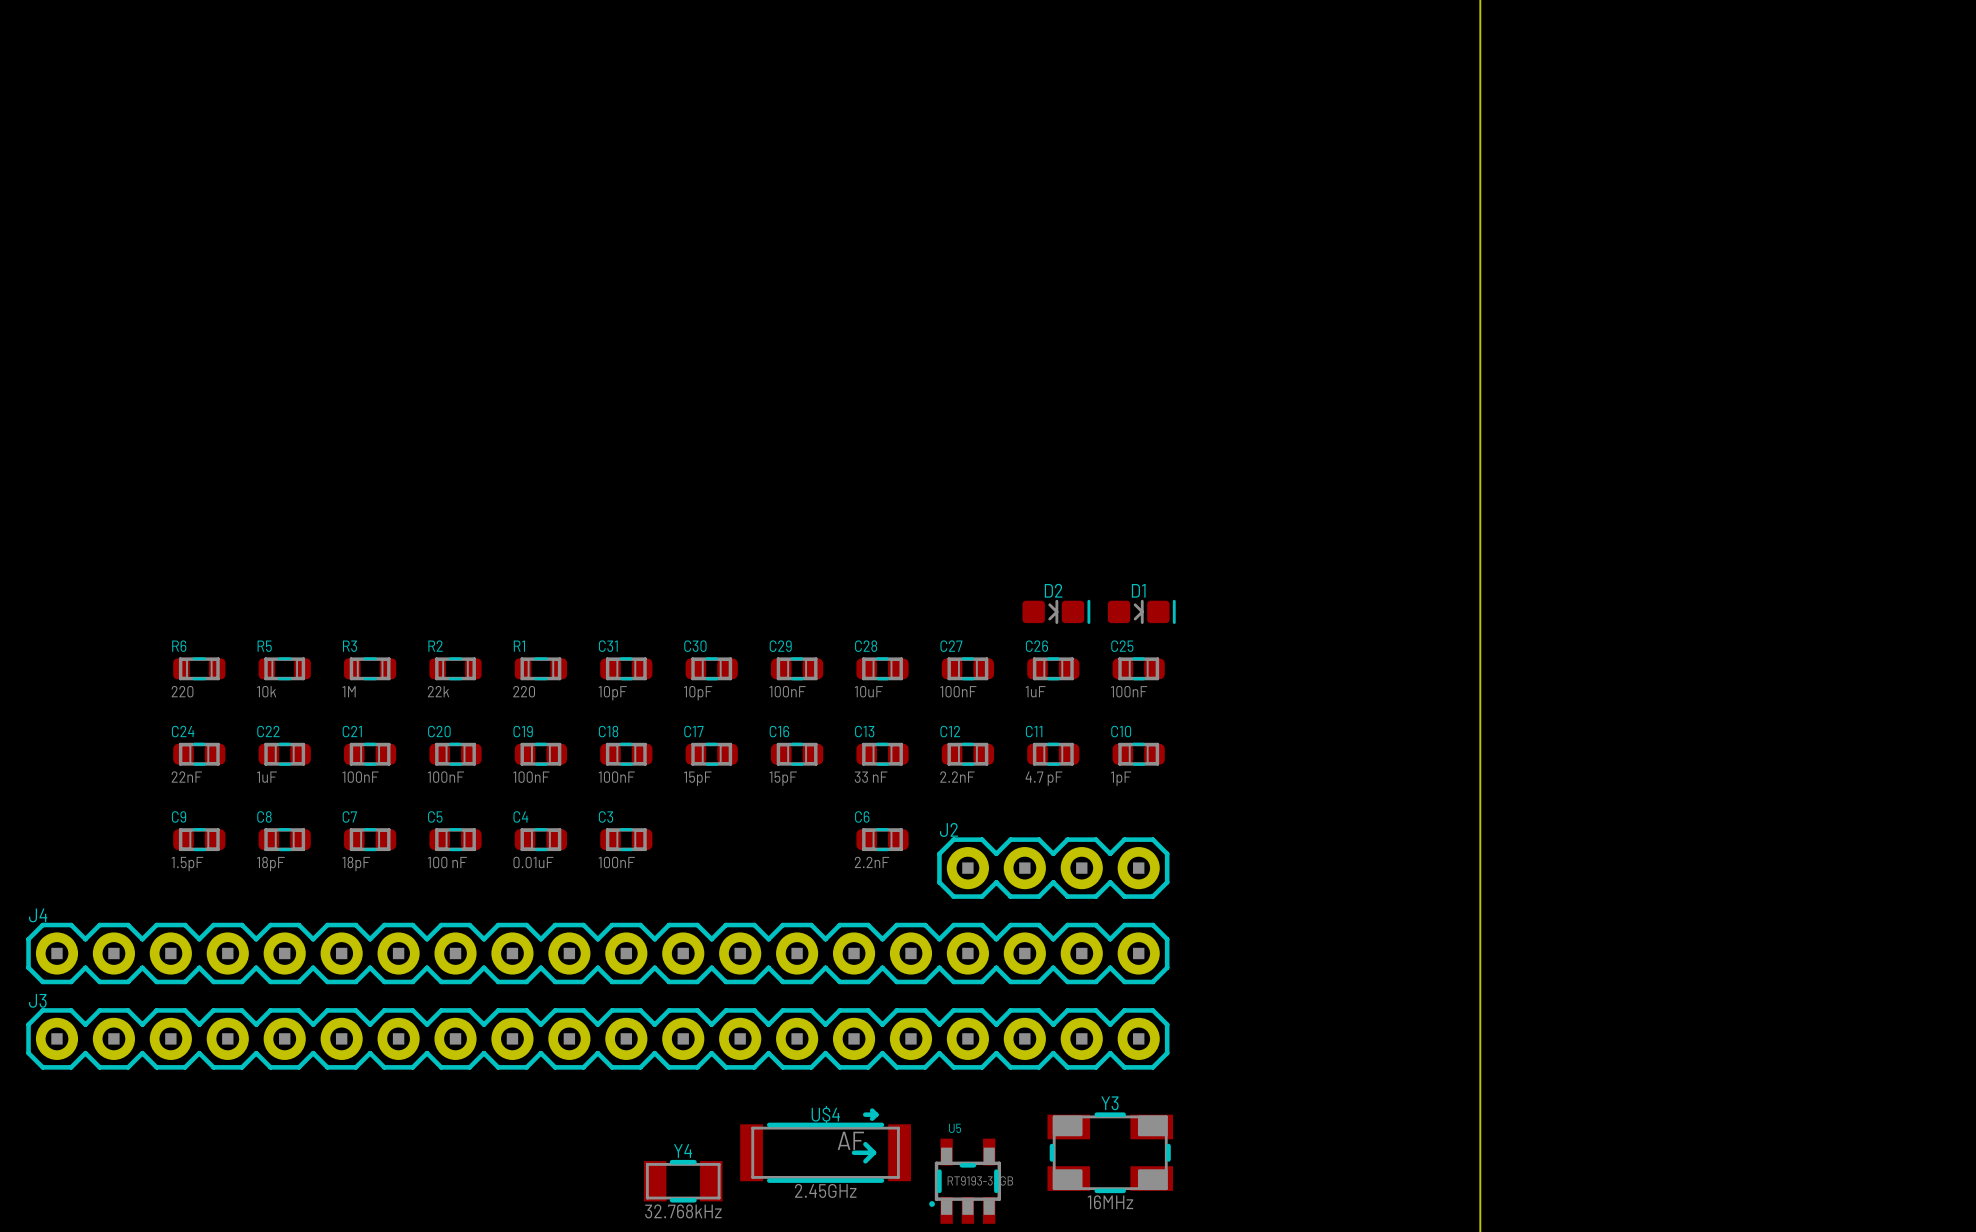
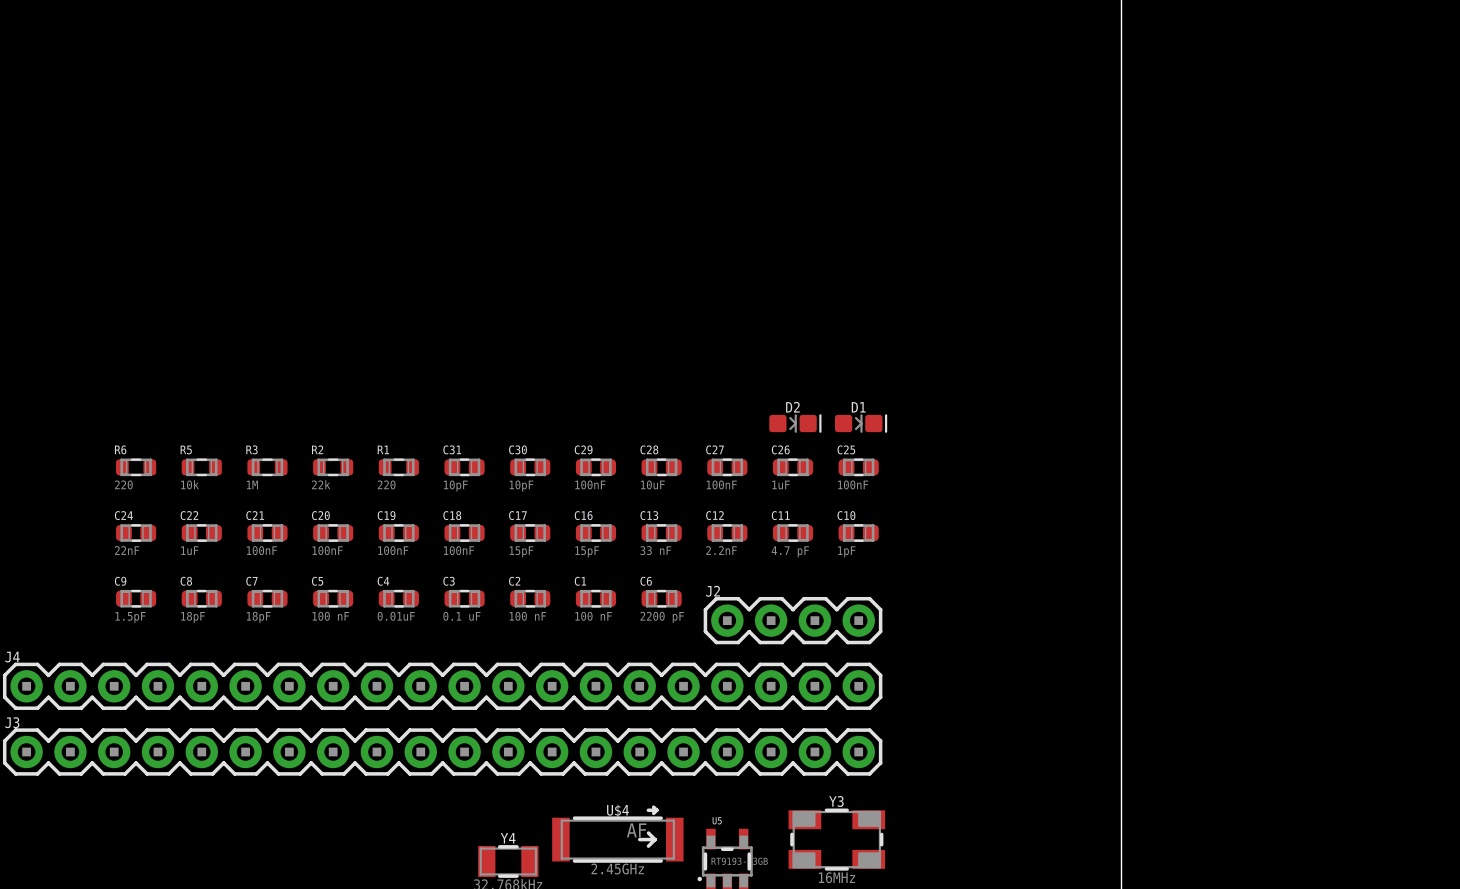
C2: none -> 100 nF (530, 598)
C1: none -> 100 nF (595, 598)
C3 value: 100nF (616, 862) -> 0.1 uF (461, 616)
C6 value: 2.2nF (872, 862) -> 2200 pF (662, 617)

